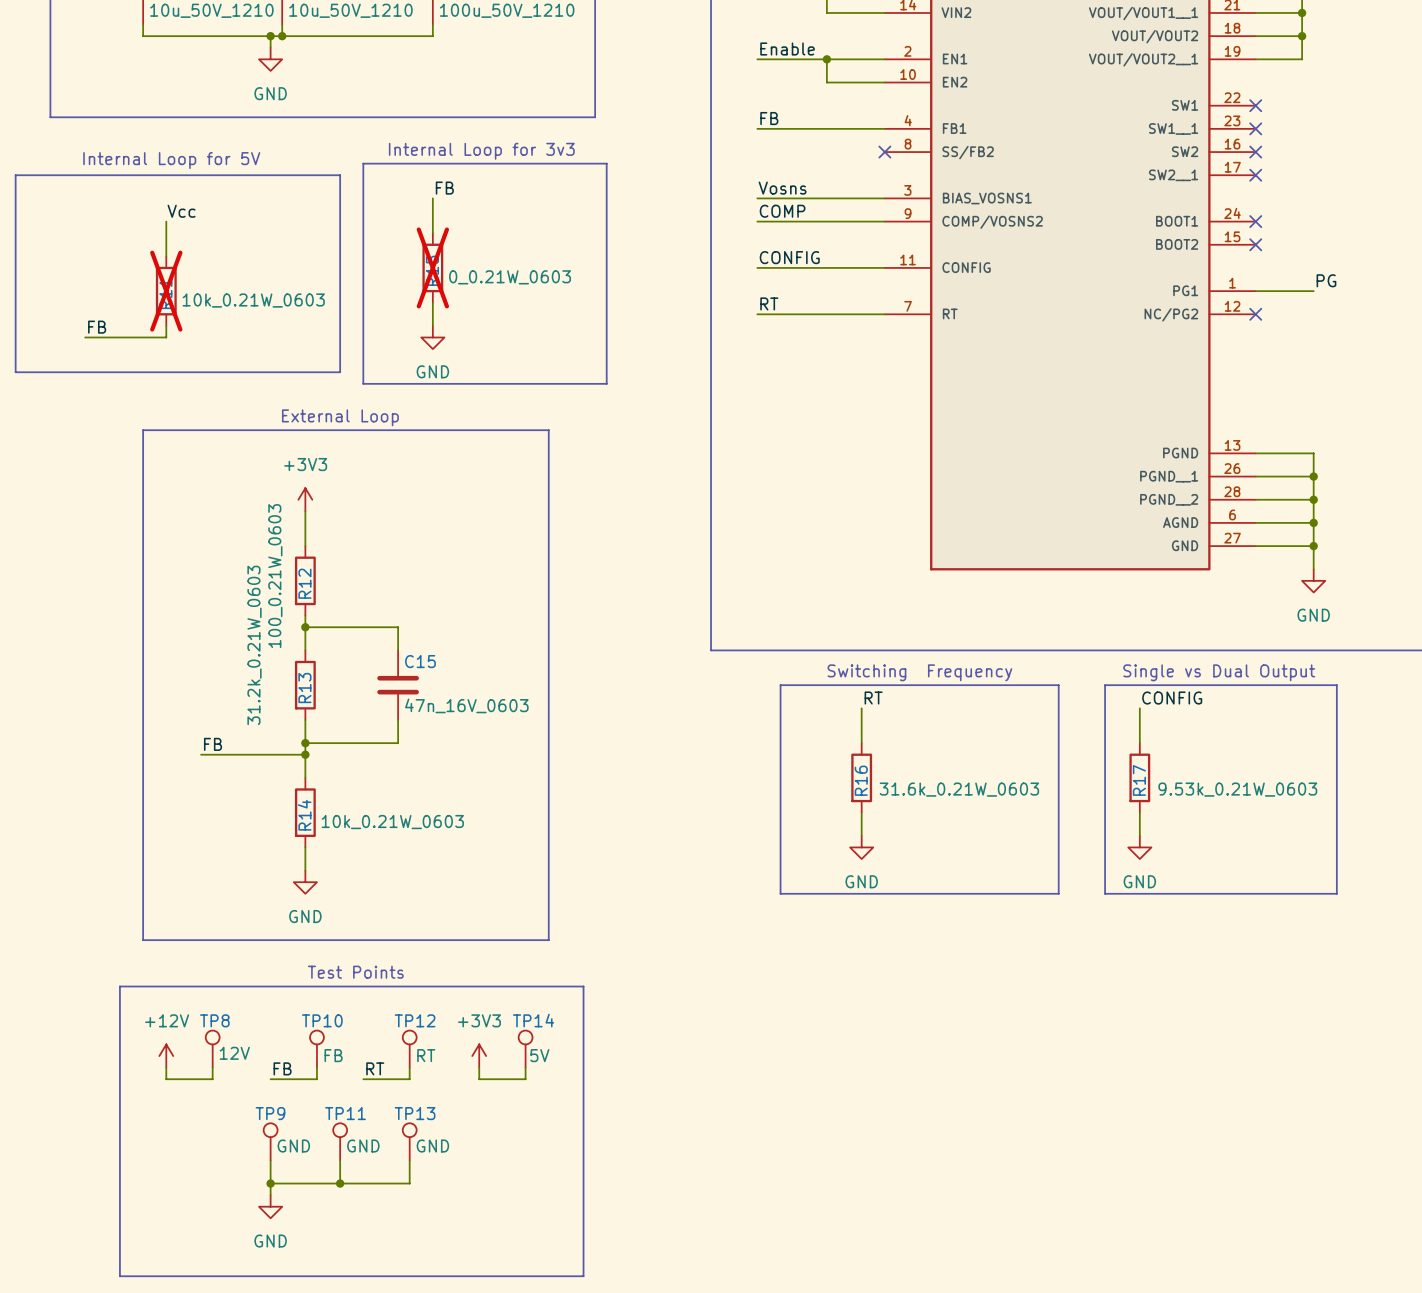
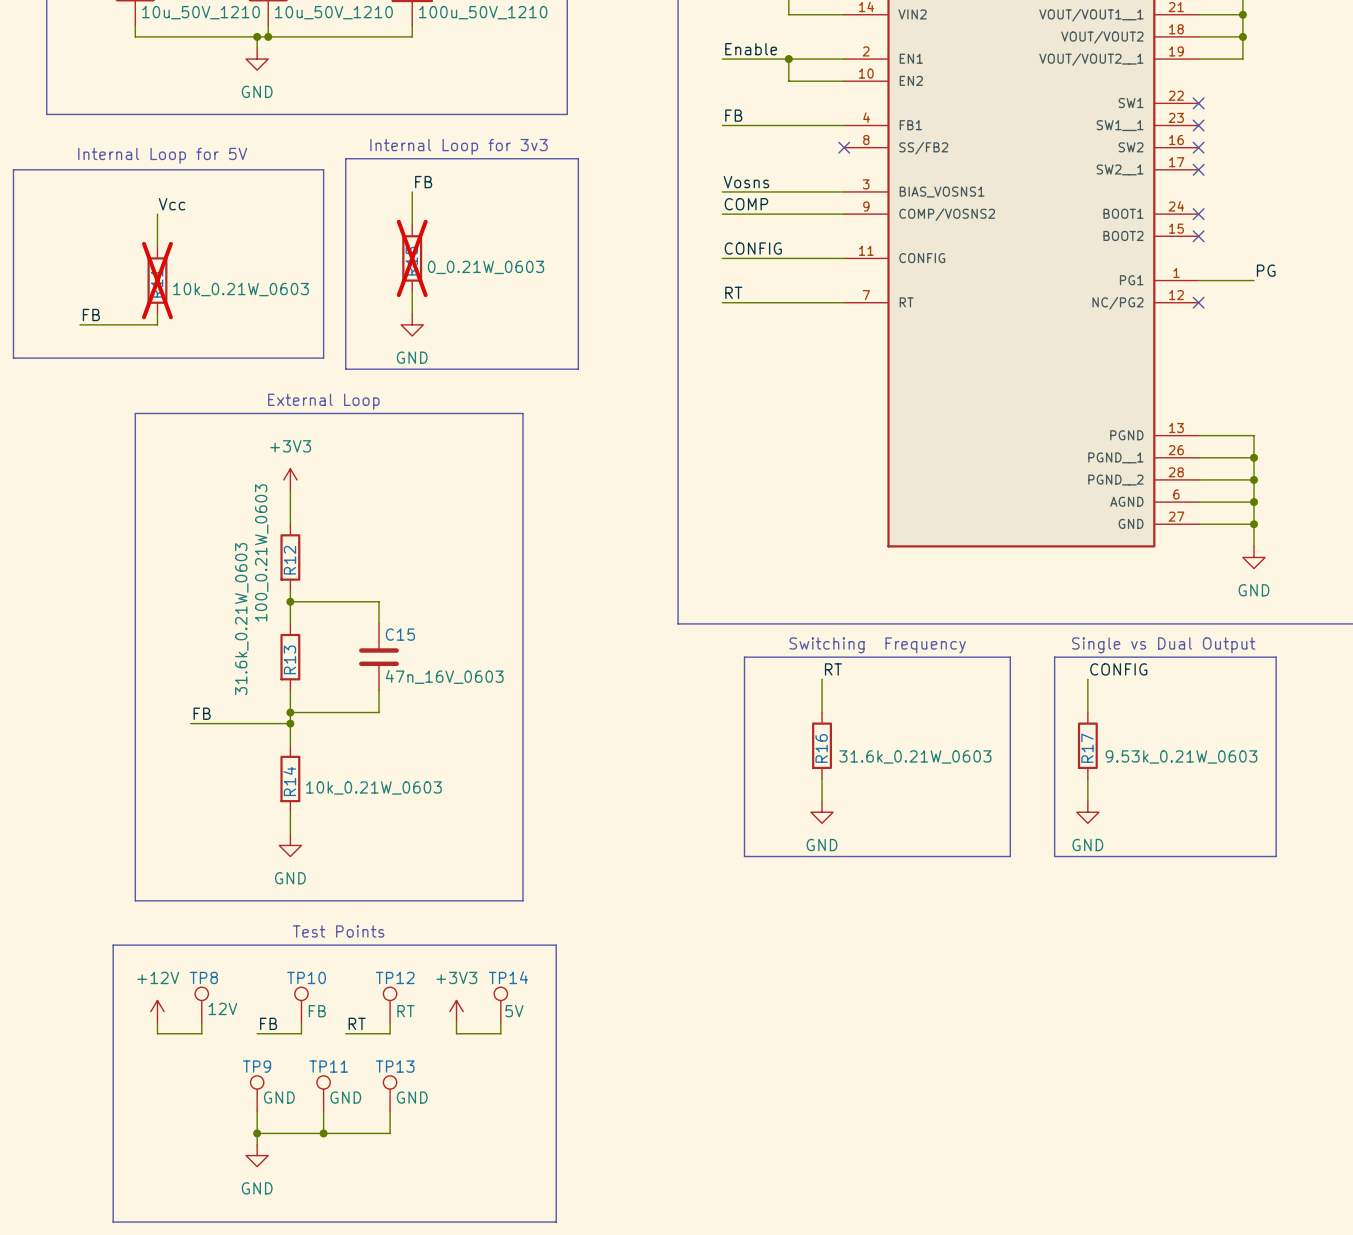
R13 value: 31.2k_0.21W_0603 (254, 645) -> 31.6k_0.21W_0603 (241, 619)

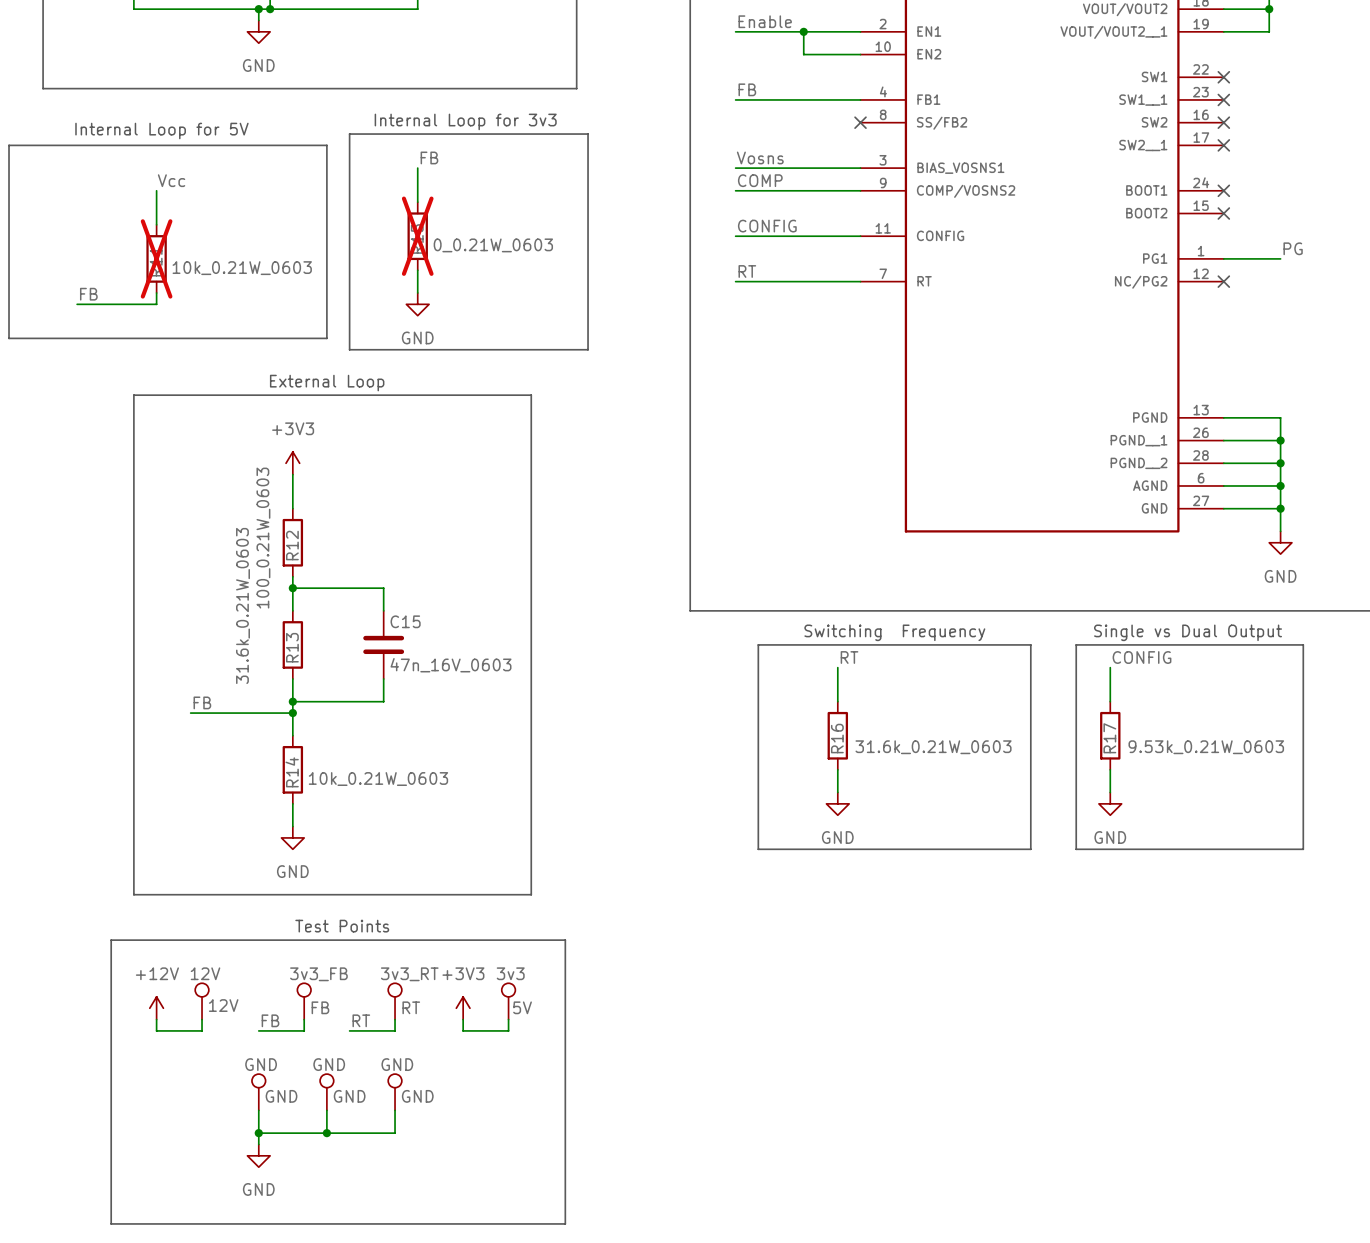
TP8 name: TP8 (203, 977) -> 12V (205, 973)
TP10 name: TP10 (306, 977) -> 3v3_FB (318, 974)
TP12 name: TP12 (395, 977) -> 3v3_RT (409, 974)
TP14 name: TP14 (508, 977) -> 3v3 (510, 973)
TP9 name: TP9 (257, 1066) -> GND (261, 1064)
TP11 name: TP11 (328, 1066) -> GND (329, 1064)
TP13 name: TP13 (395, 1066) -> GND (397, 1064)

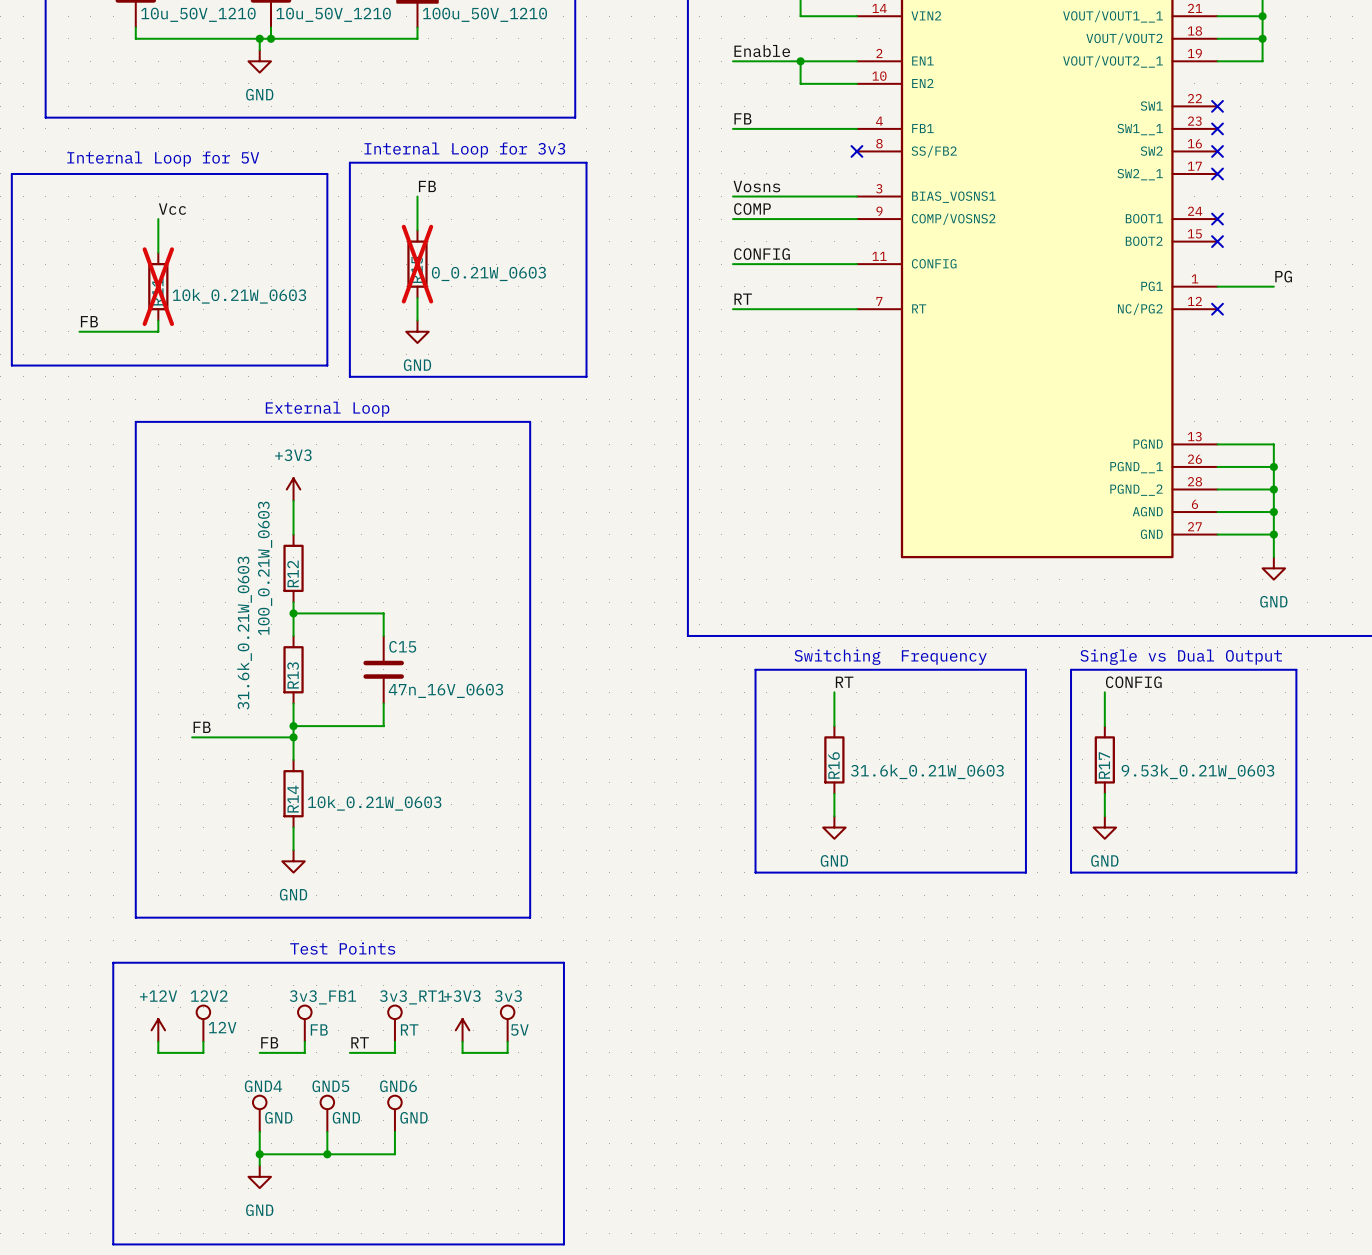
12V name: 12V (205, 973) -> 12V2 (209, 996)
3v3_FB name: 3v3_FB (318, 974) -> 3v3_FB1 (322, 997)
3v3_RT name: 3v3_RT (409, 974) -> 3v3_RT1 (413, 997)
GND name: GND (261, 1064) -> GND4 (263, 1086)
GND name: GND (329, 1064) -> GND5 (330, 1086)
GND name: GND (397, 1064) -> GND6 (398, 1086)

